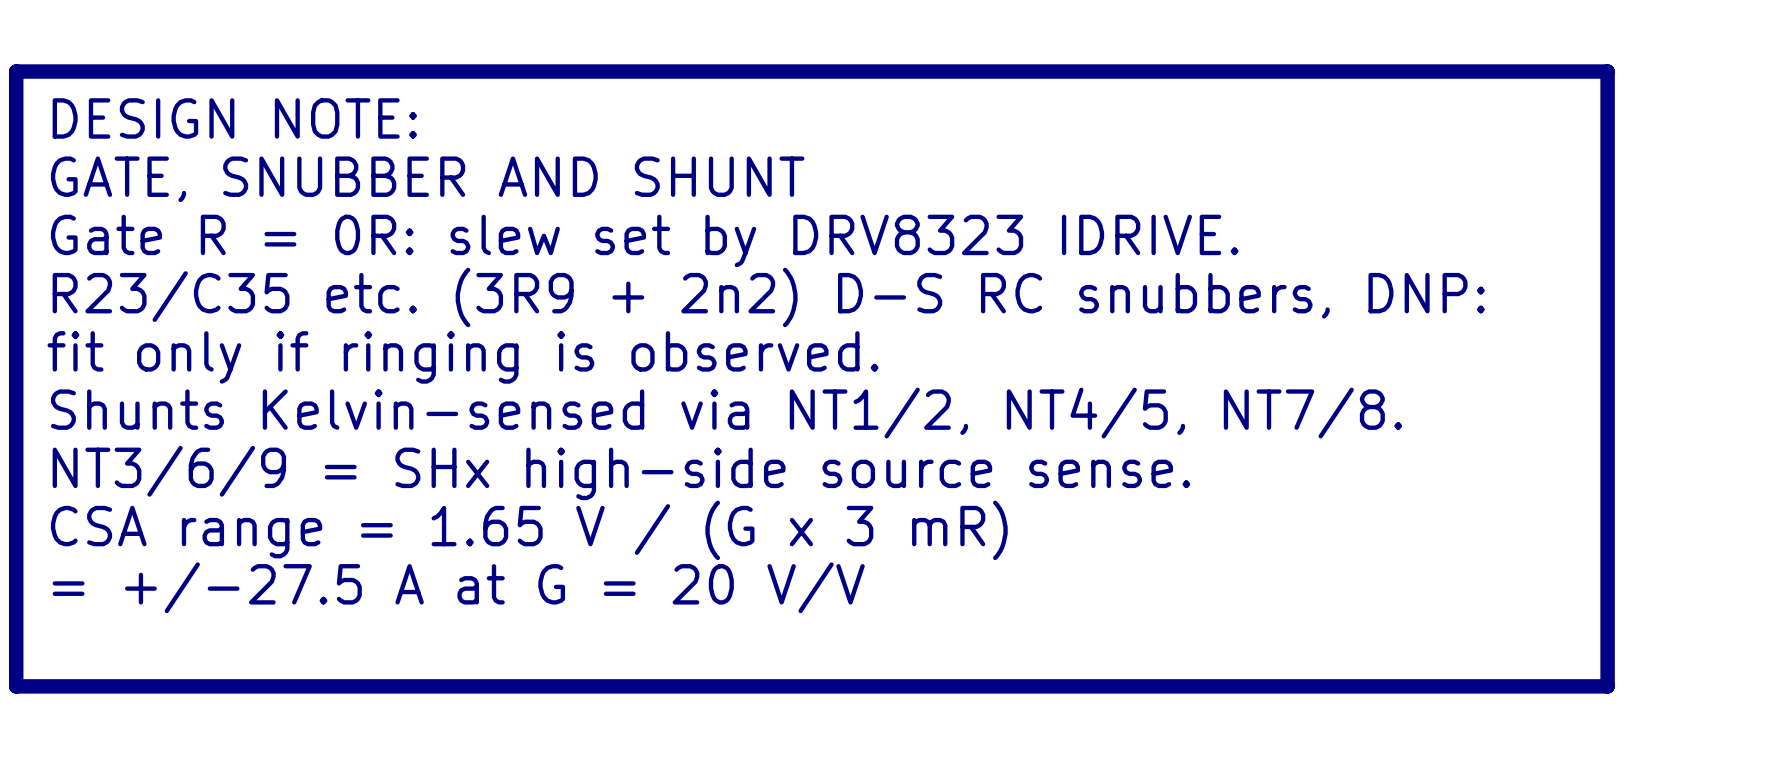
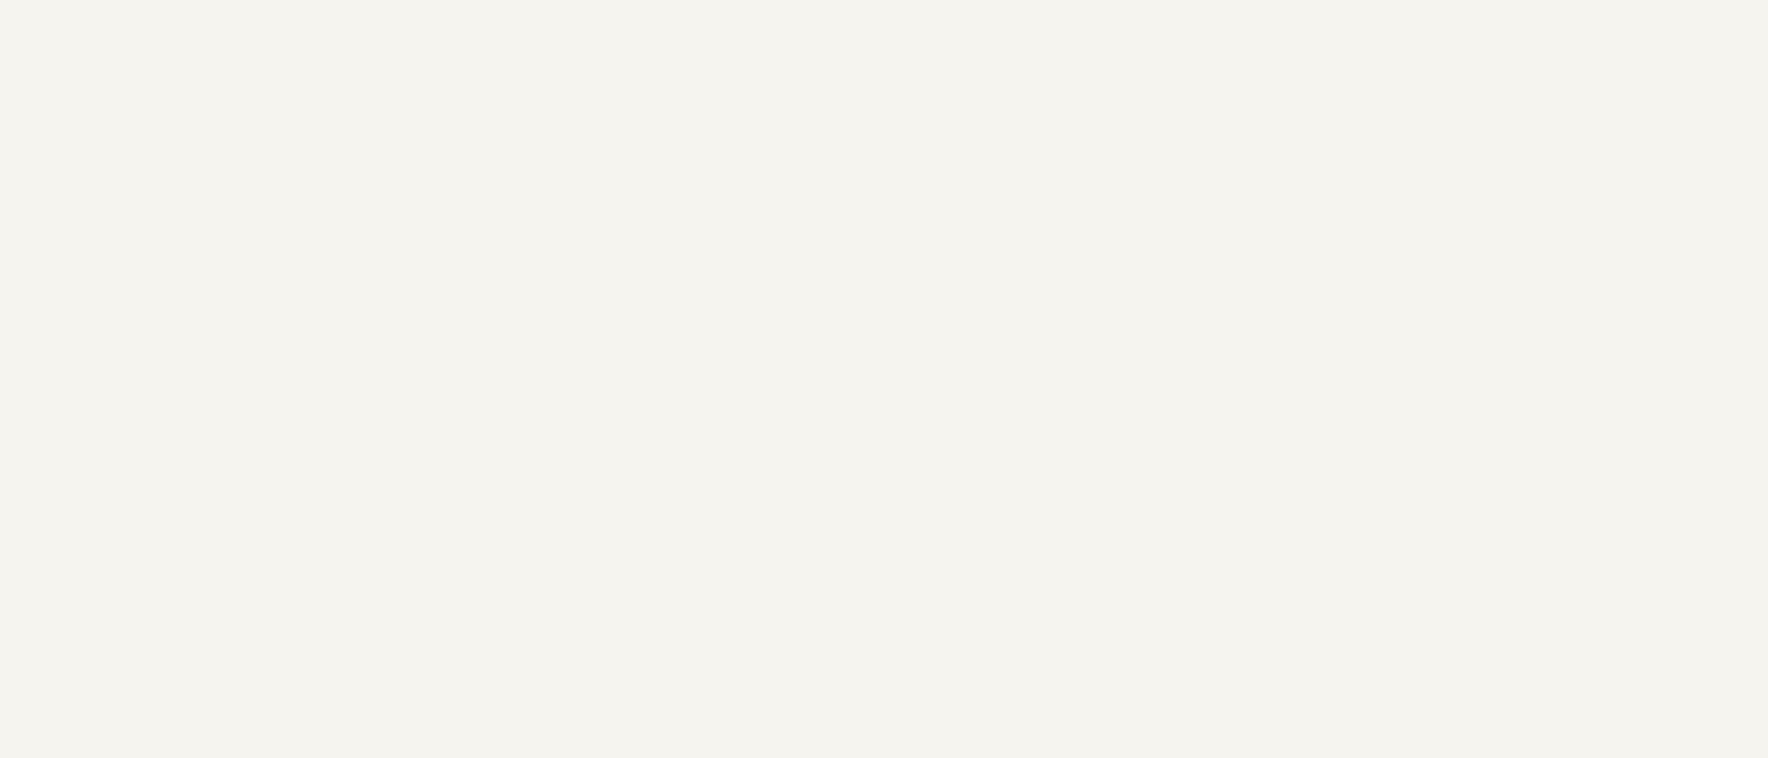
line: (16, 71) (1607, 71) (1607, 686) (16, 686) (16, 71) -> none
text: DESIGN NOTE: (234, 118) -> none
text: GATE, SNUBBER AND SHUNT (427, 179) -> none
text: Gate R = 0R: slew set by DRV8323 IDRIVE. (644, 240) -> none
text: R23/C35 etc. (3R9 + 2n2) D-S RC snubbers, DNP: (768, 297) -> none
text: fit only if ringing is observed. (462, 357) -> none
text: Shunts Kelvin-sensed via NT1/2, NT4/5, NT7/8. (726, 413) -> none
text: NT3/6/9 = SHx high-side source sense. (621, 473) -> none
text: CSA range = 1.65 V / (G x 3 mR) (529, 530) -> none
text: = +/-27.5 A at G = 20 V/V (458, 587) -> none

